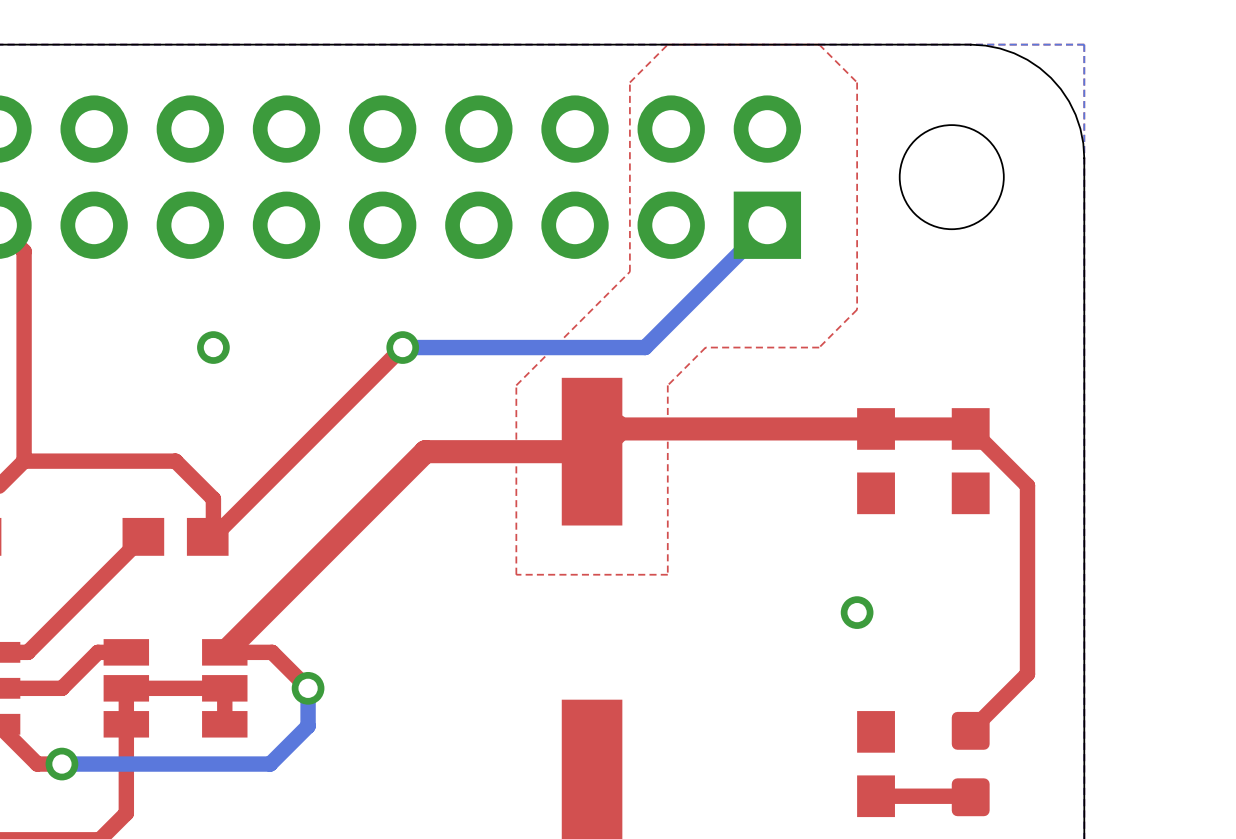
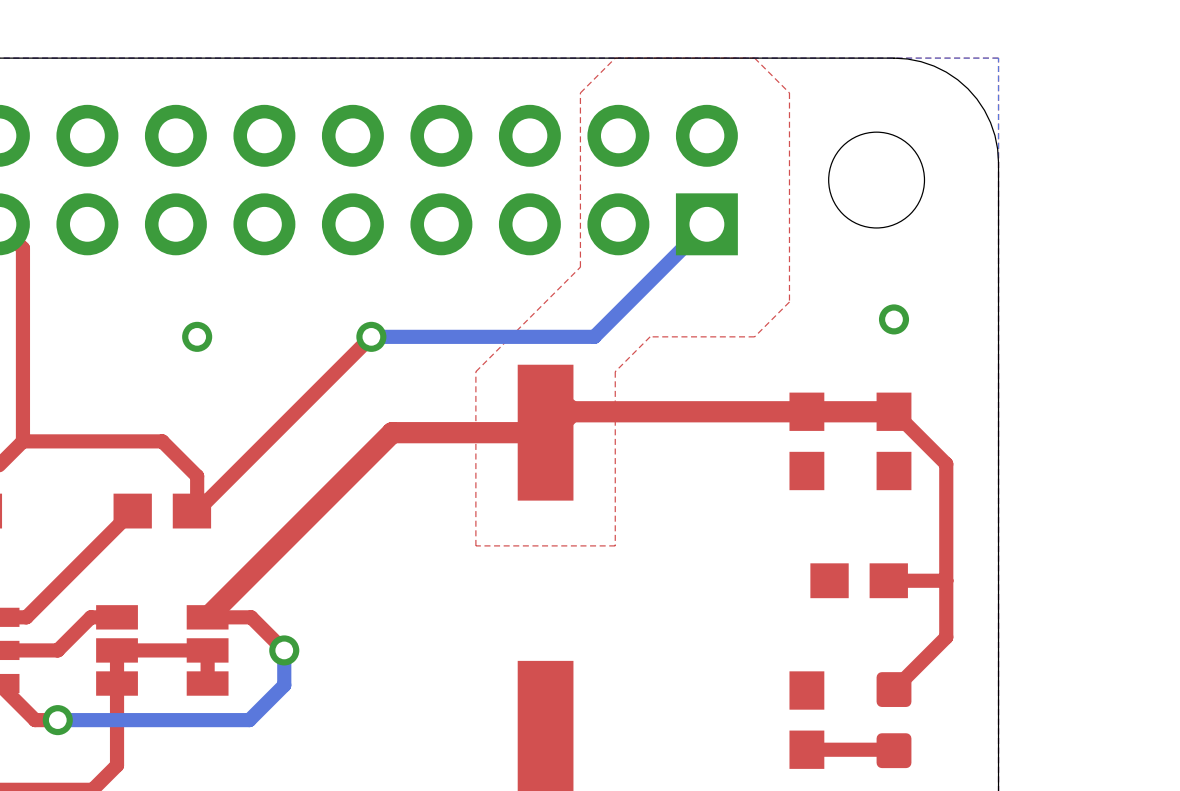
via: none -> (894, 319)
via: (857, 612) -> none
part: none -> (859, 580)
top track: none -> (946, 580) (888, 580)

